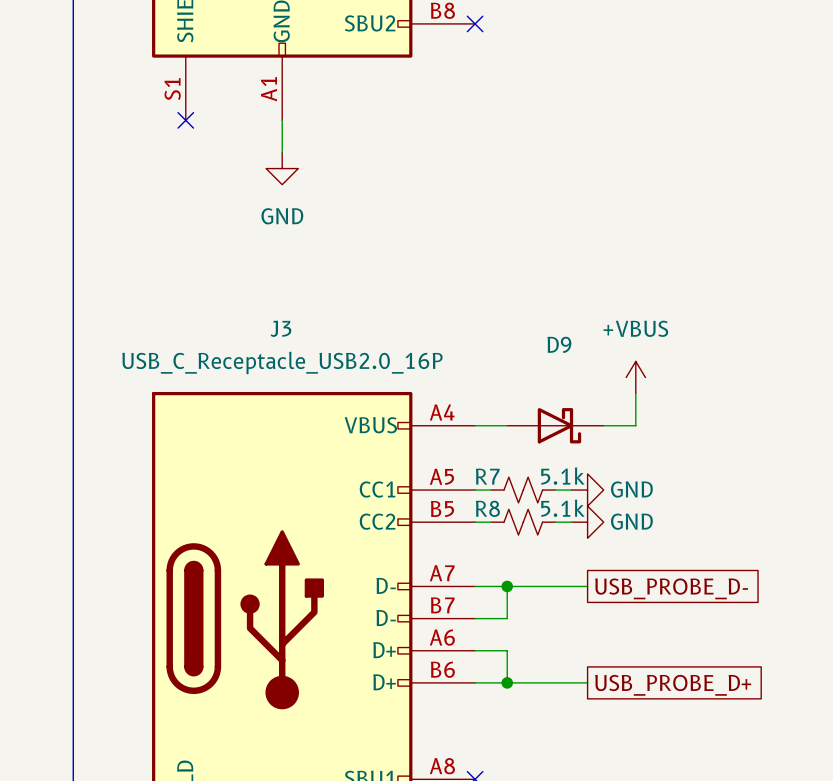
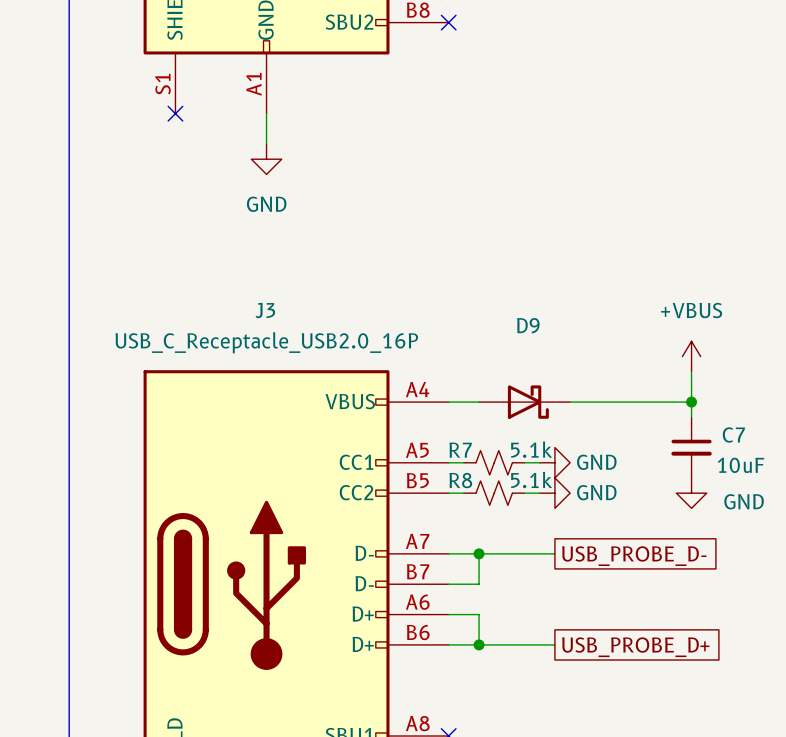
power symbol position: +VBUS (635, 377) -> +VBUS (691, 356)
wire: (635, 393) (635, 425) -> (691, 402) (600, 402)
wire: none -> (691, 371) (691, 417)
junction: none -> (691, 402)
C7: none -> 10uF (691, 447)
power symbol: none -> GND (691, 493)

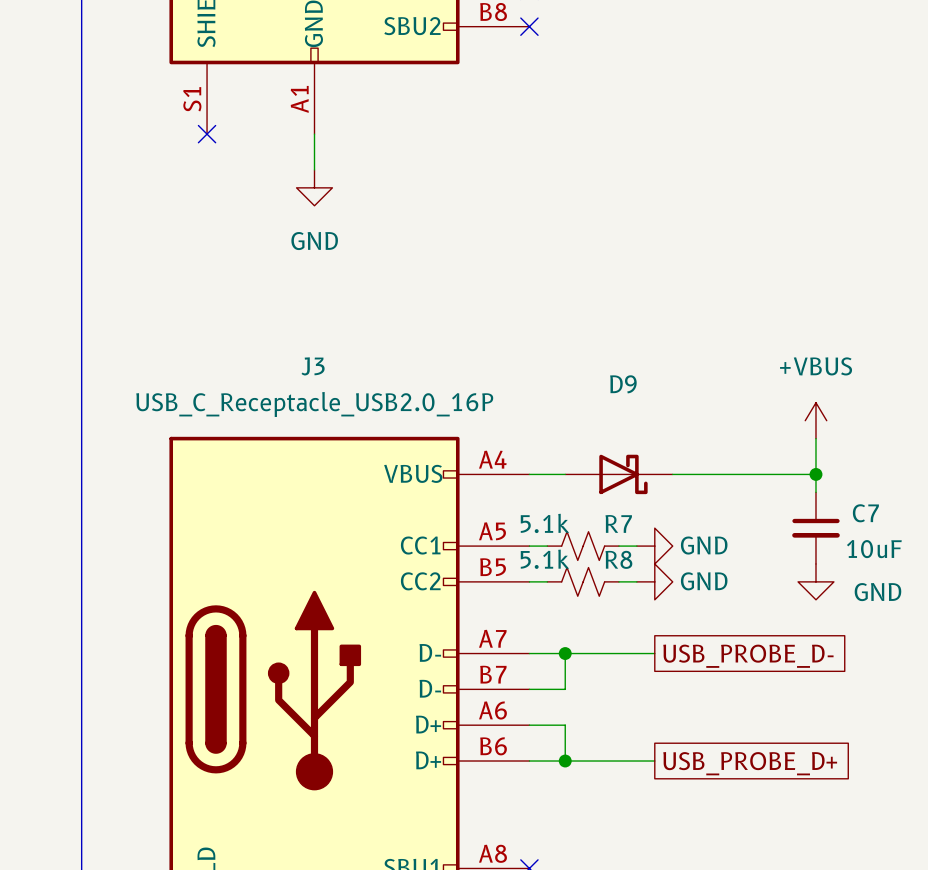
R7 value position: 5.1k (531, 449) -> 5.1k (544, 523)
R7 name position: R7 (460, 450) -> R7 (618, 523)
R8 name position: R8 (460, 480) -> R8 (618, 559)
R8 value position: 5.1k (531, 480) -> 5.1k (544, 559)

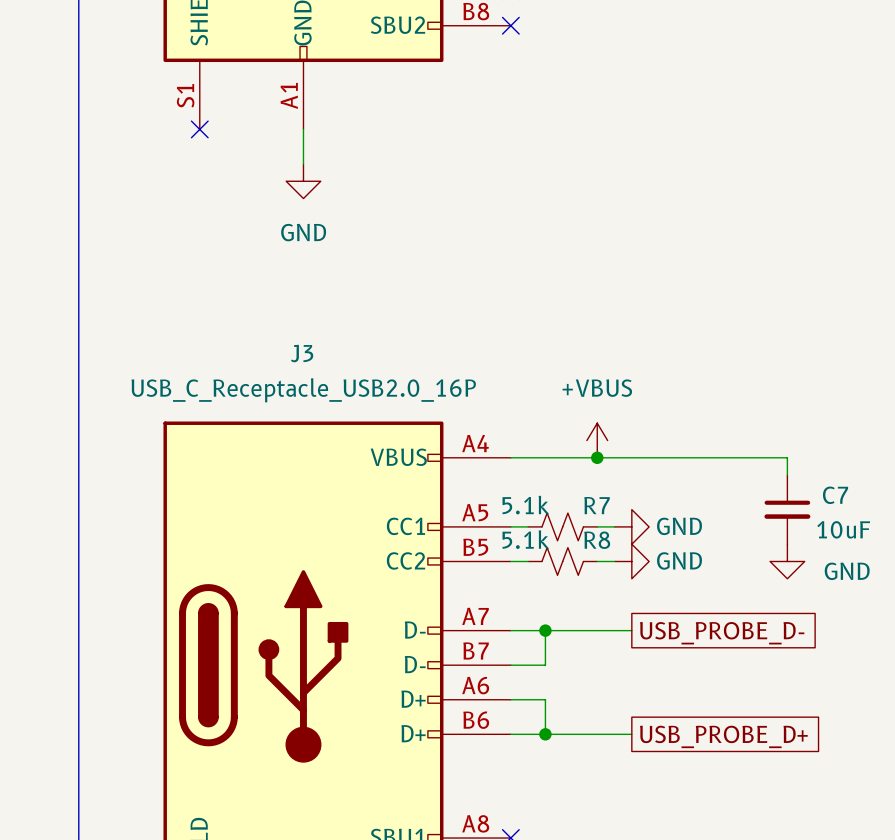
power symbol position: +VBUS (815, 420) -> +VBUS (597, 440)
wire: (815, 438) (815, 474) -> none
junction: none -> (597, 457)
D9: (618, 474) -> none
junction: (815, 474) -> none

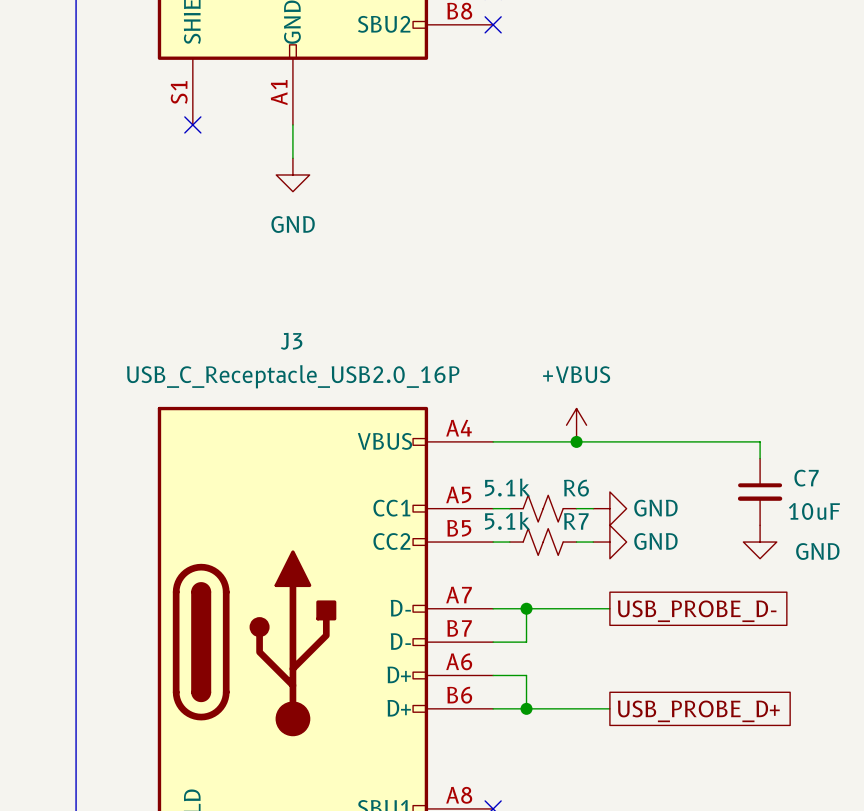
R7 name: R7 (597, 505) -> R6 (576, 488)
R8 name: R8 (597, 540) -> R7 (576, 521)

